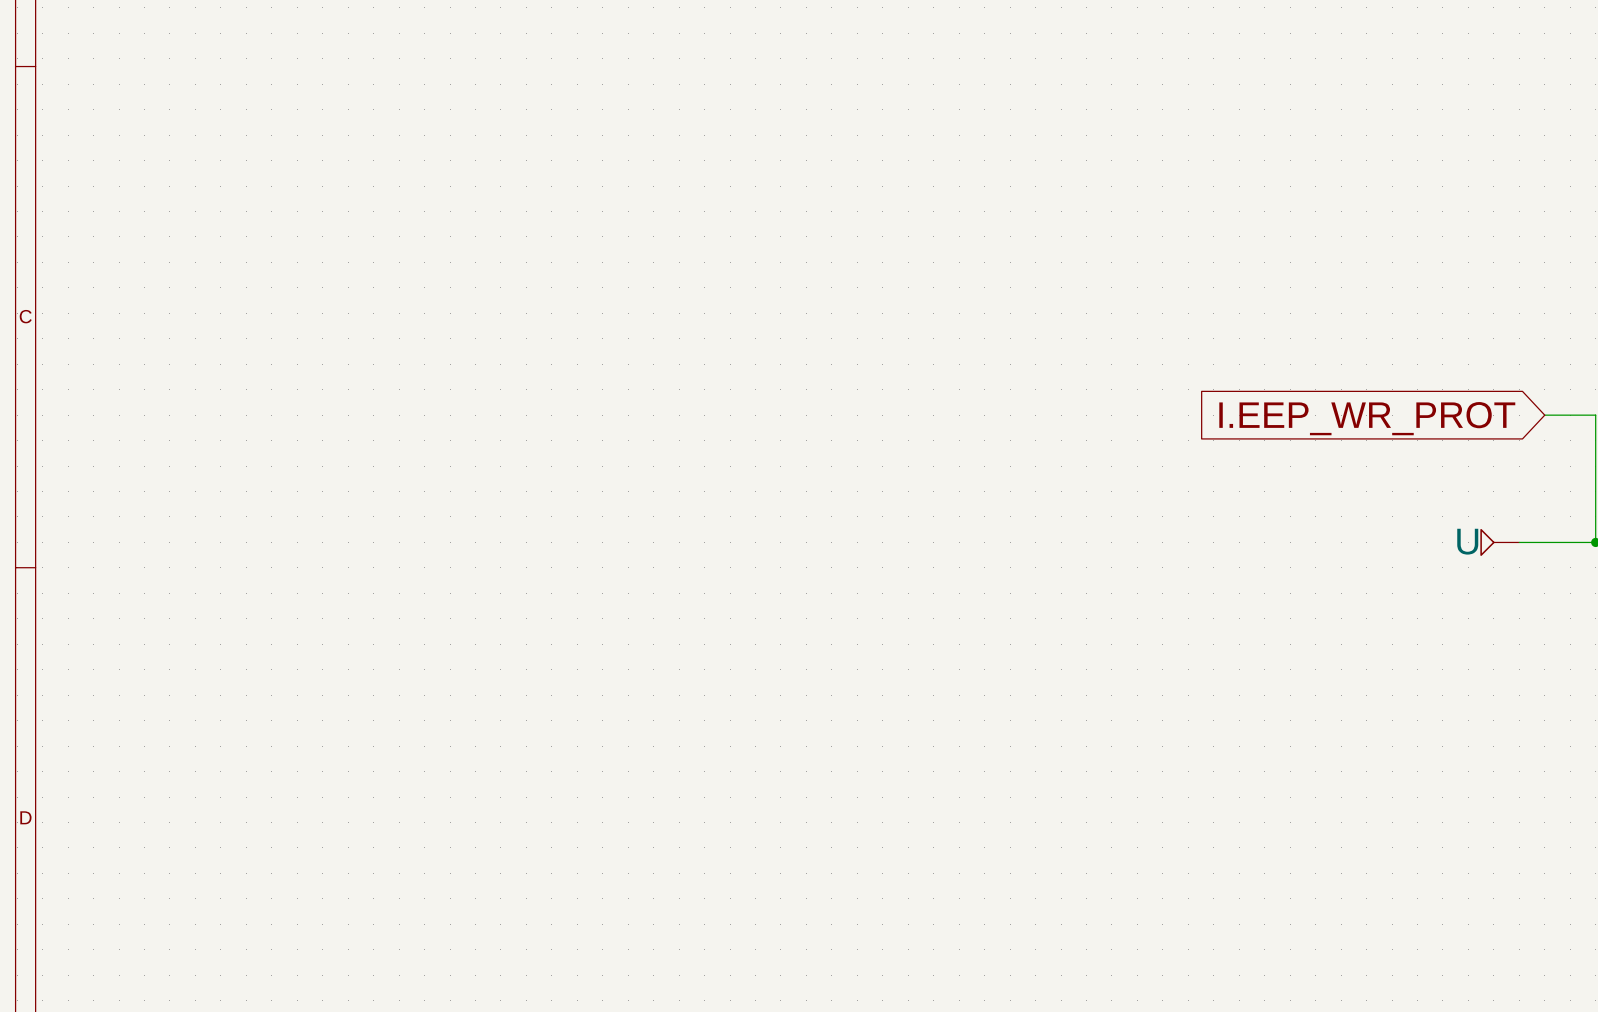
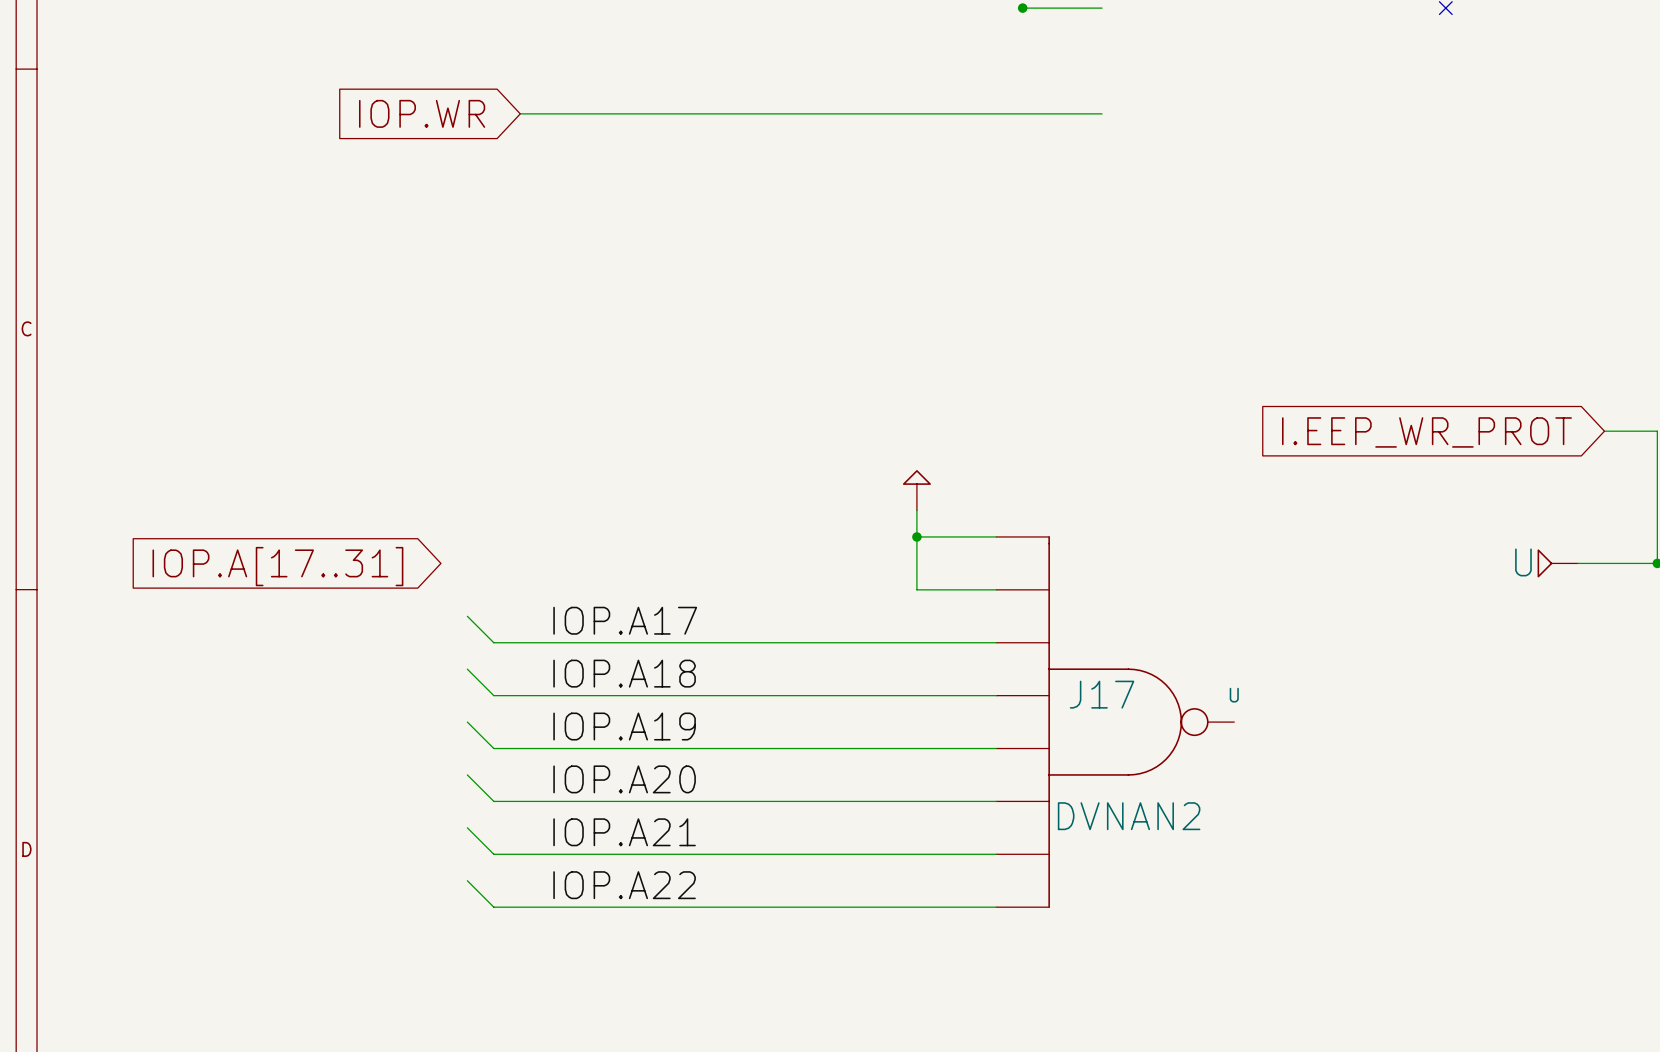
wire: none -> (1022, 8) (1102, 8)
junction: none -> (1022, 8)
no-connect mark: none -> (1445, 8)
global label: none -> IOP.WR (422, 113)
wire: none -> (520, 113) (1102, 113)
power symbol: none -> (916, 490)
wire: none -> (916, 510) (916, 589) (996, 589)
wire: none -> (916, 536) (996, 536)
junction: none -> (916, 536)
global label: none -> IOP.A[17..31] (277, 566)
wire: none -> (467, 616) (493, 642) (996, 642)
label: none -> IOP.A17 (625, 620)
wire: none -> (467, 669) (493, 695) (996, 695)
label: none -> IOP.A18 (624, 673)
wire: none -> (467, 722) (493, 748) (996, 748)
U: none -> (1115, 722)
label: none -> IOP.A19 (624, 726)
wire: none -> (467, 774) (493, 801) (996, 801)
label: none -> IOP.A20 (624, 779)
wire: none -> (467, 827) (493, 854) (996, 854)
label: none -> IOP.A21 (624, 832)
wire: none -> (467, 880) (493, 907) (996, 907)
label: none -> IOP.A22 (624, 885)

